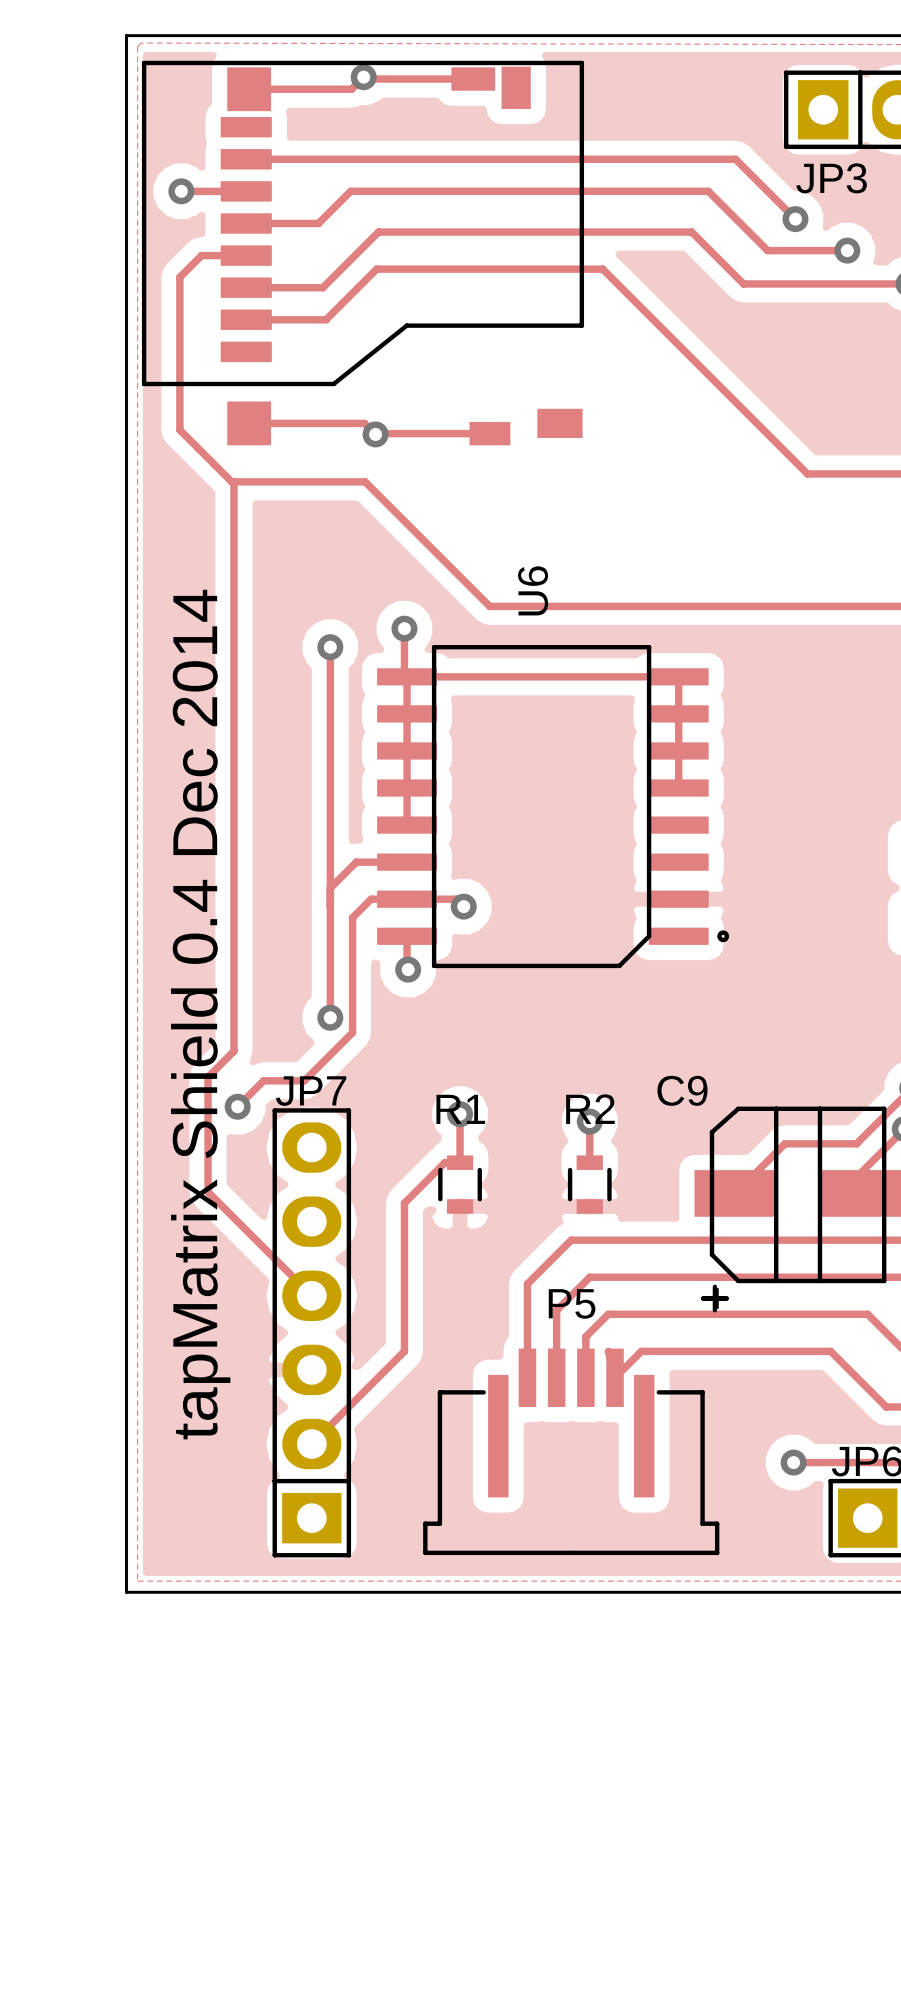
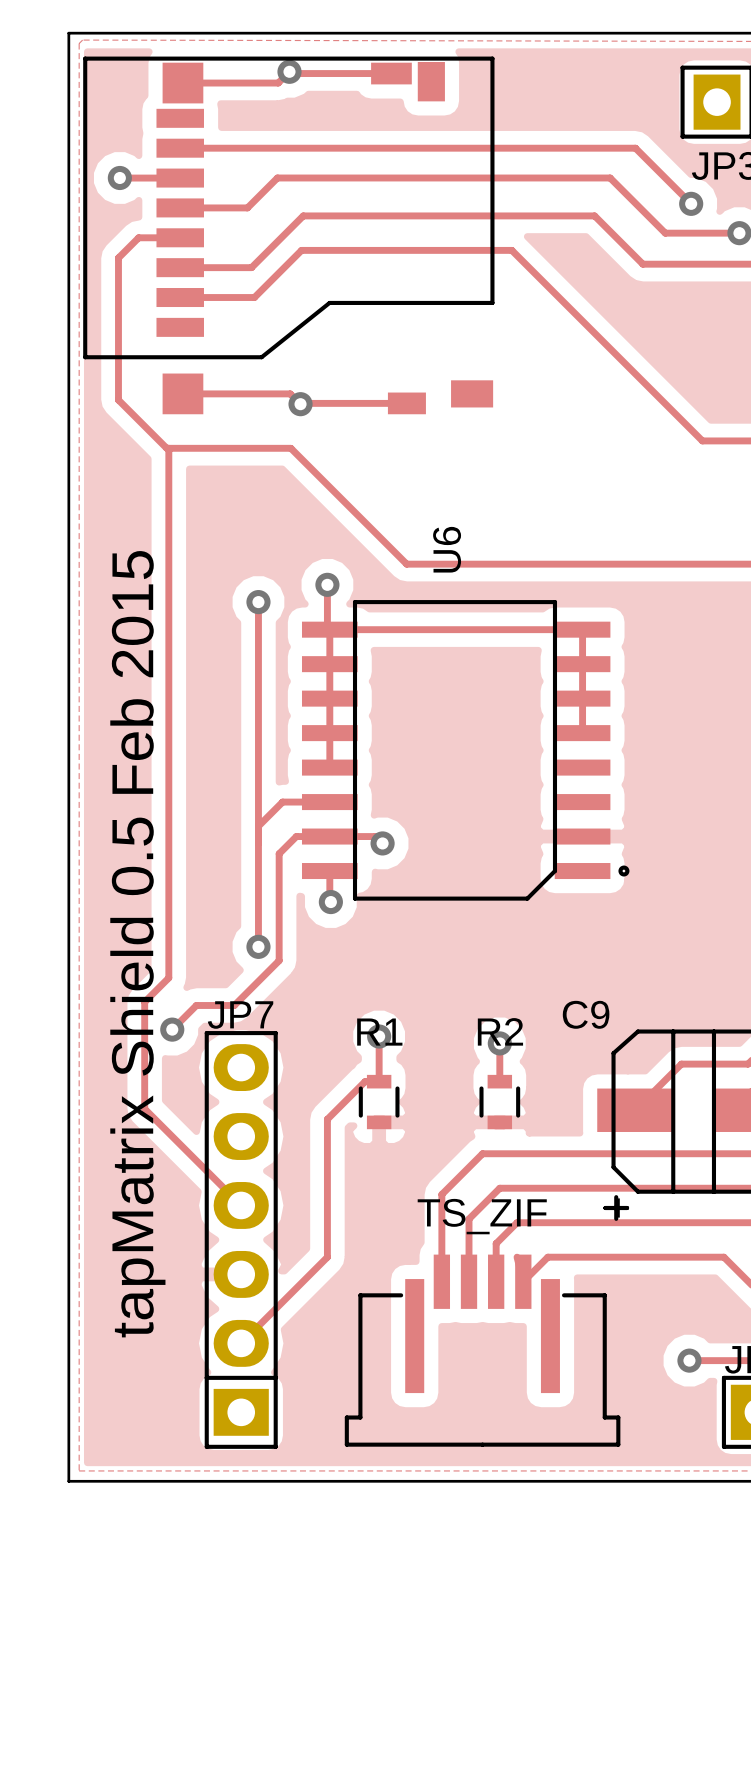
text: tapMatrix Shield 0.4 Dec 2014 (200, 1014) -> tapMatrix Shield 0.5 Feb 2015 (137, 944)
part value: P5 (572, 1303) -> TS_ZIF (482, 1216)

